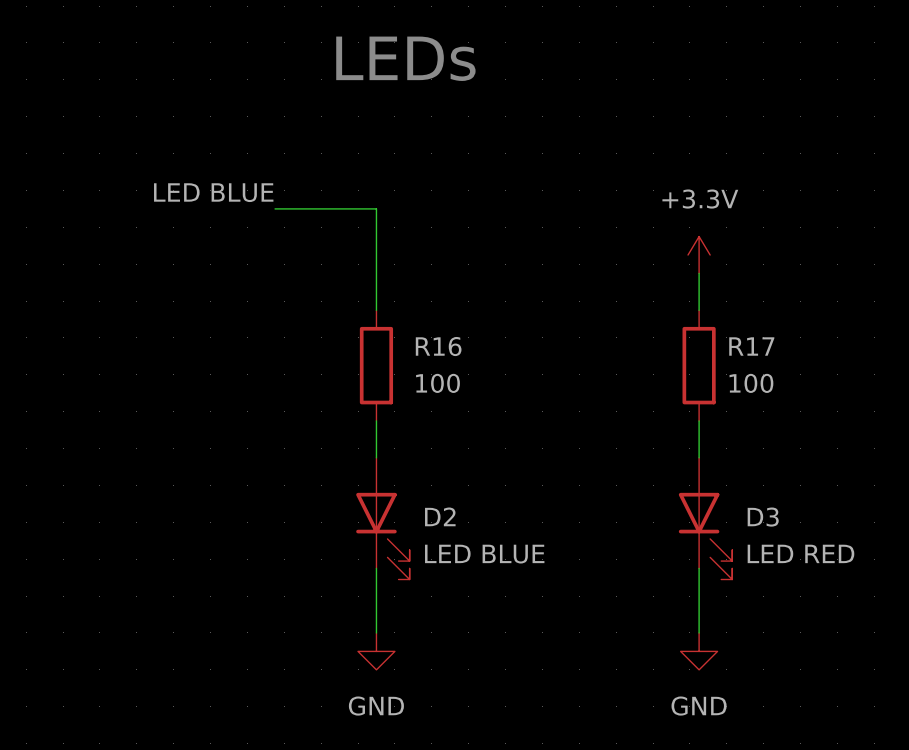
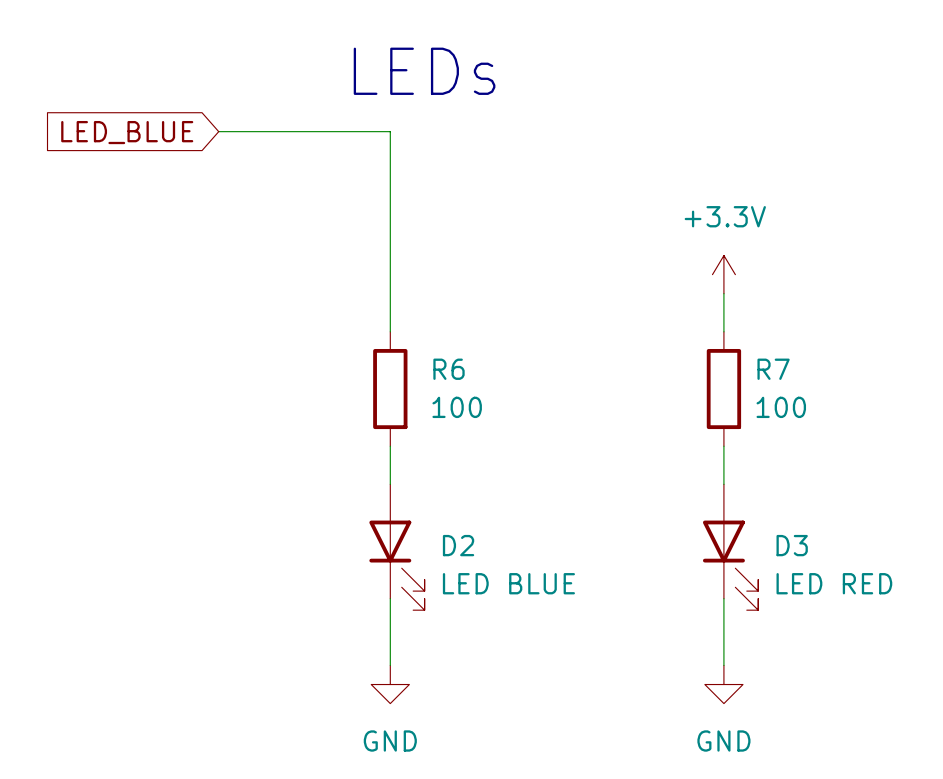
global label: none -> LED_BLUE (127, 132)
label: LED BLUE (213, 192) -> none
wire: (275, 208) (376, 208) -> (218, 131) (390, 131) (390, 226)
R16 name: R16 (438, 346) -> R6 (449, 369)
R17 name: R17 (751, 346) -> R7 (773, 369)

